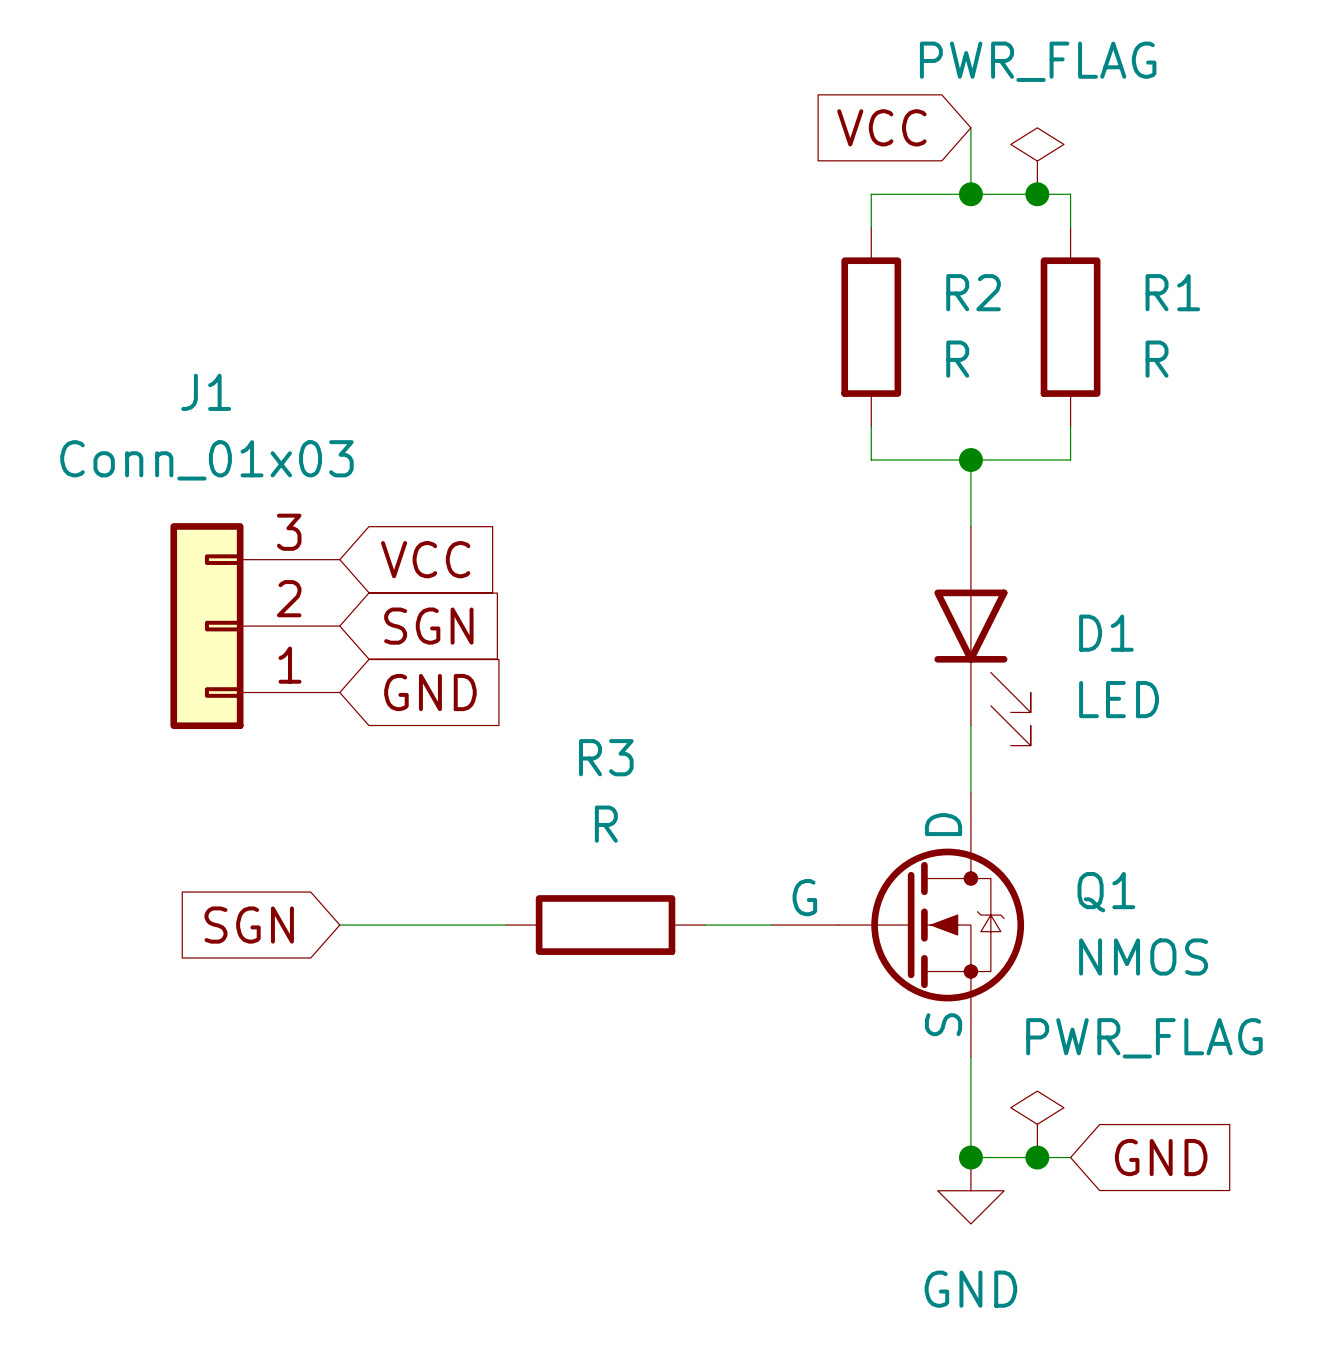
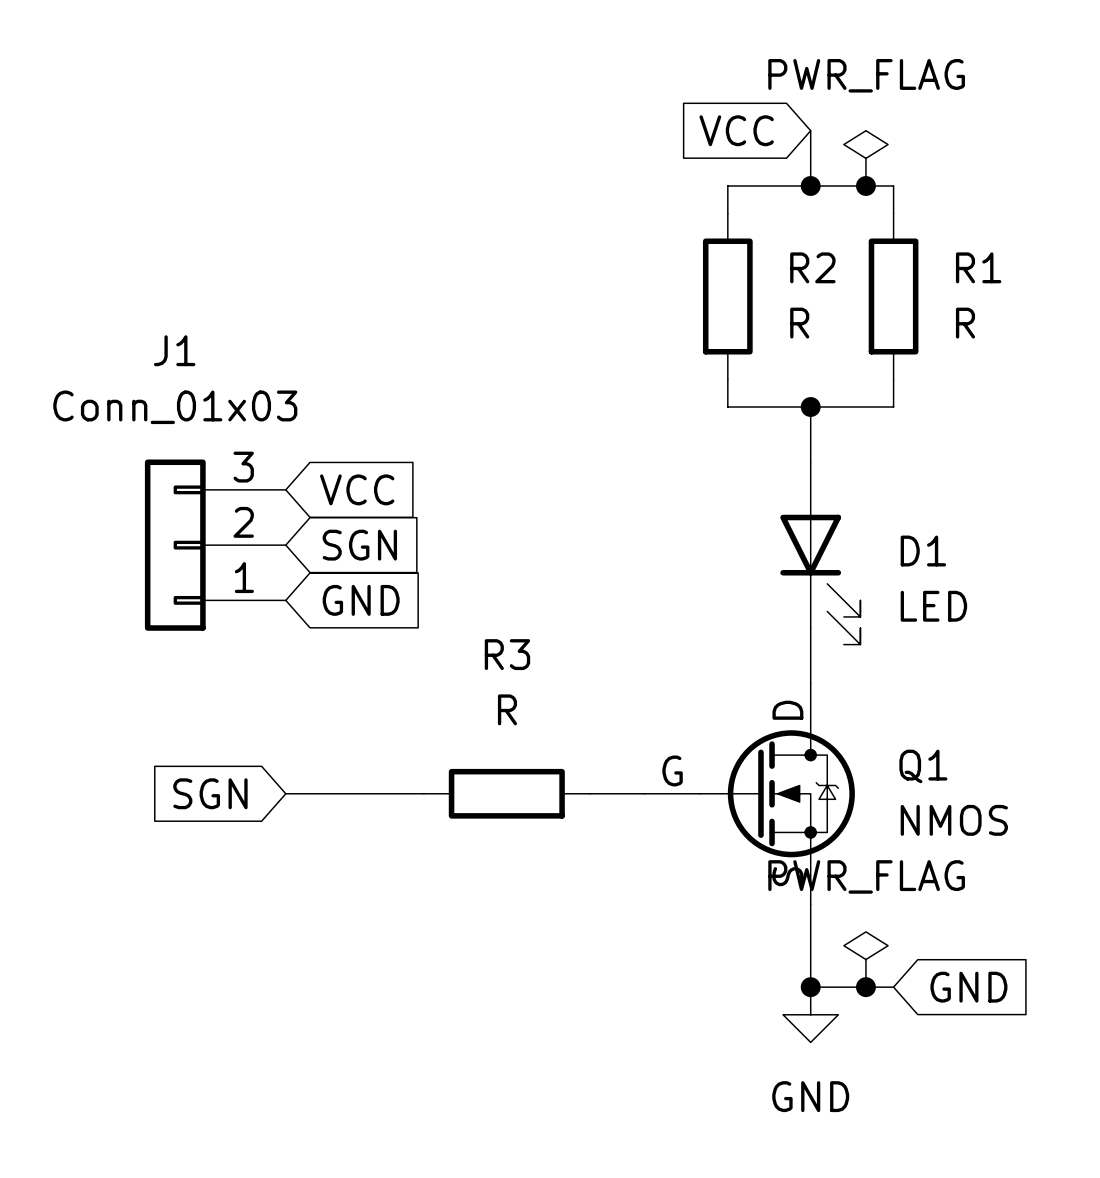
power symbol text position: PWR_FLAG (1144, 1038) -> PWR_FLAG (866, 876)

